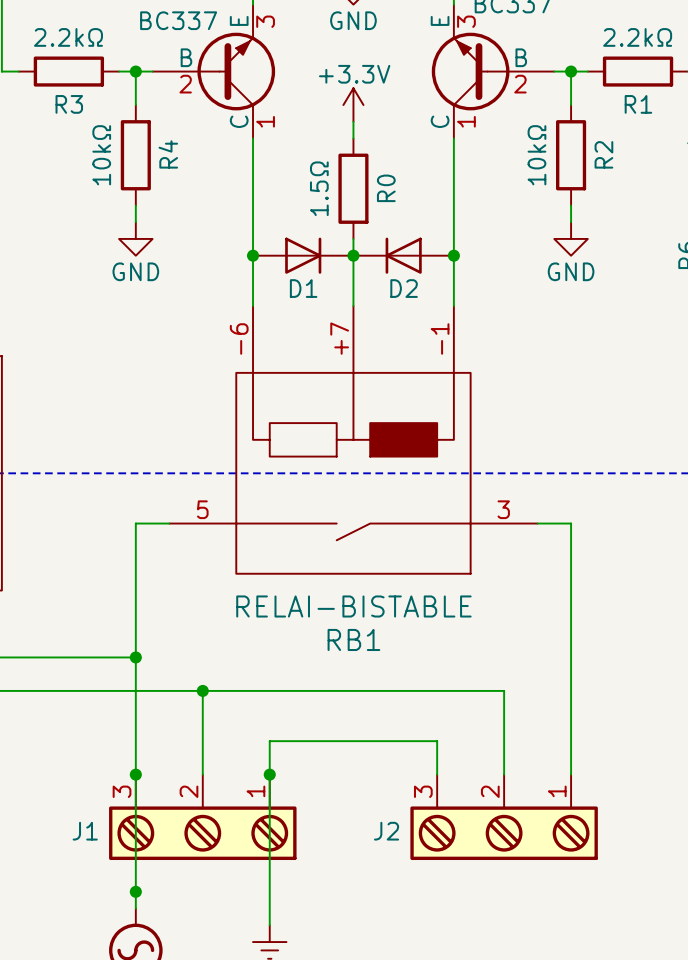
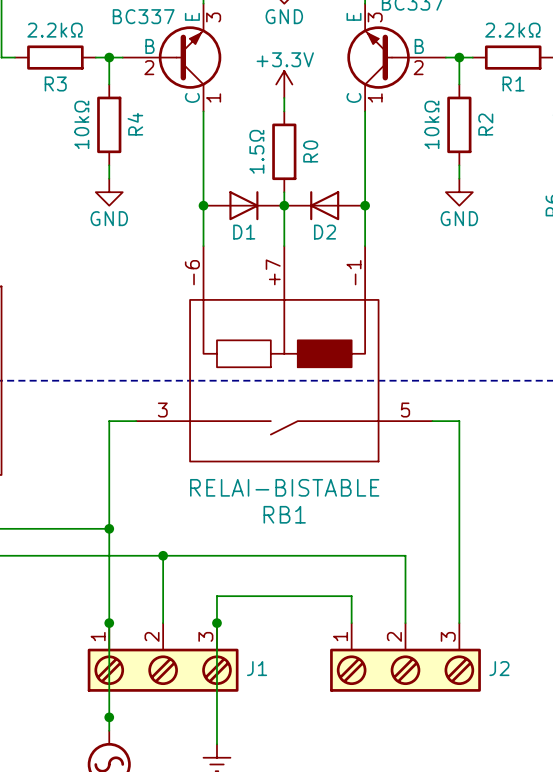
RB1 pin number: 5 (202, 509) -> 3 (162, 410)
RB1 pin number: 3 (503, 509) -> 5 (405, 410)
J1 flip: as is (202, 833) -> left-right (163, 670)
J2 flip: as is (504, 833) -> left-right (405, 670)

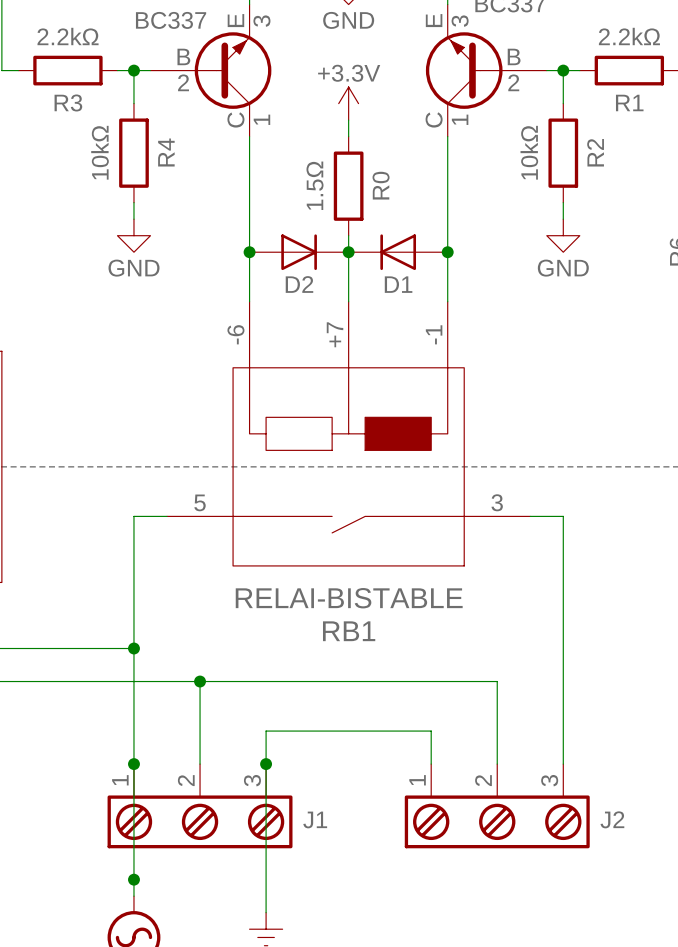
D1 name: D1 (244, 232) -> D2 (299, 284)
D2 name: D2 (325, 232) -> D1 (398, 284)
RB1 pin number: 3 (162, 410) -> 5 (200, 502)
RB1 pin number: 5 (405, 410) -> 3 (497, 502)

